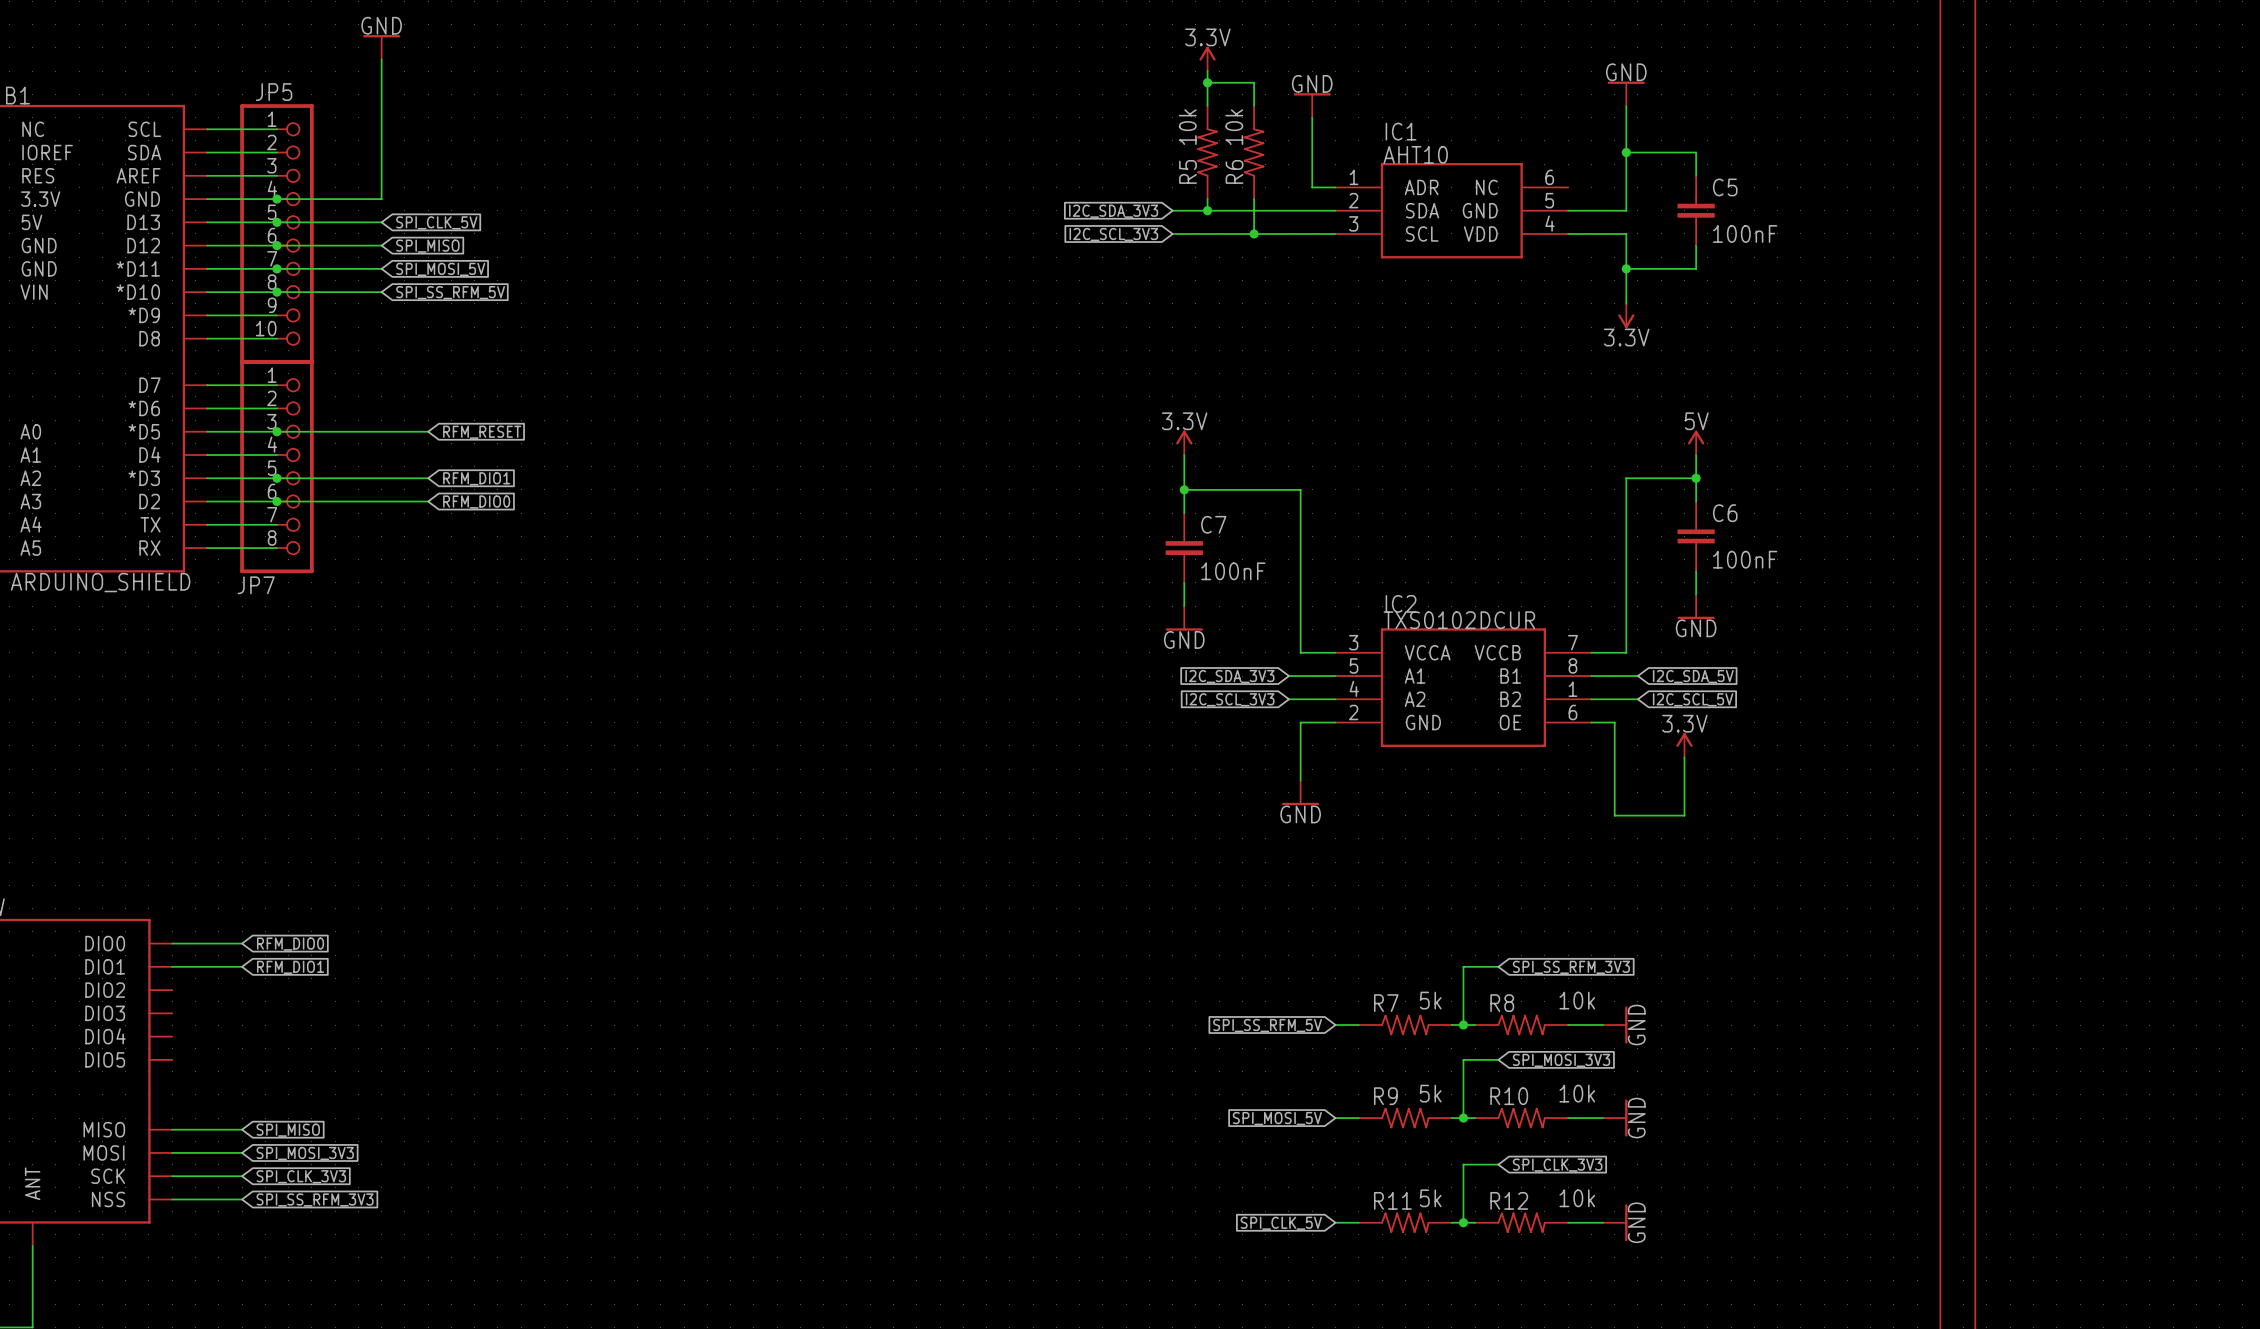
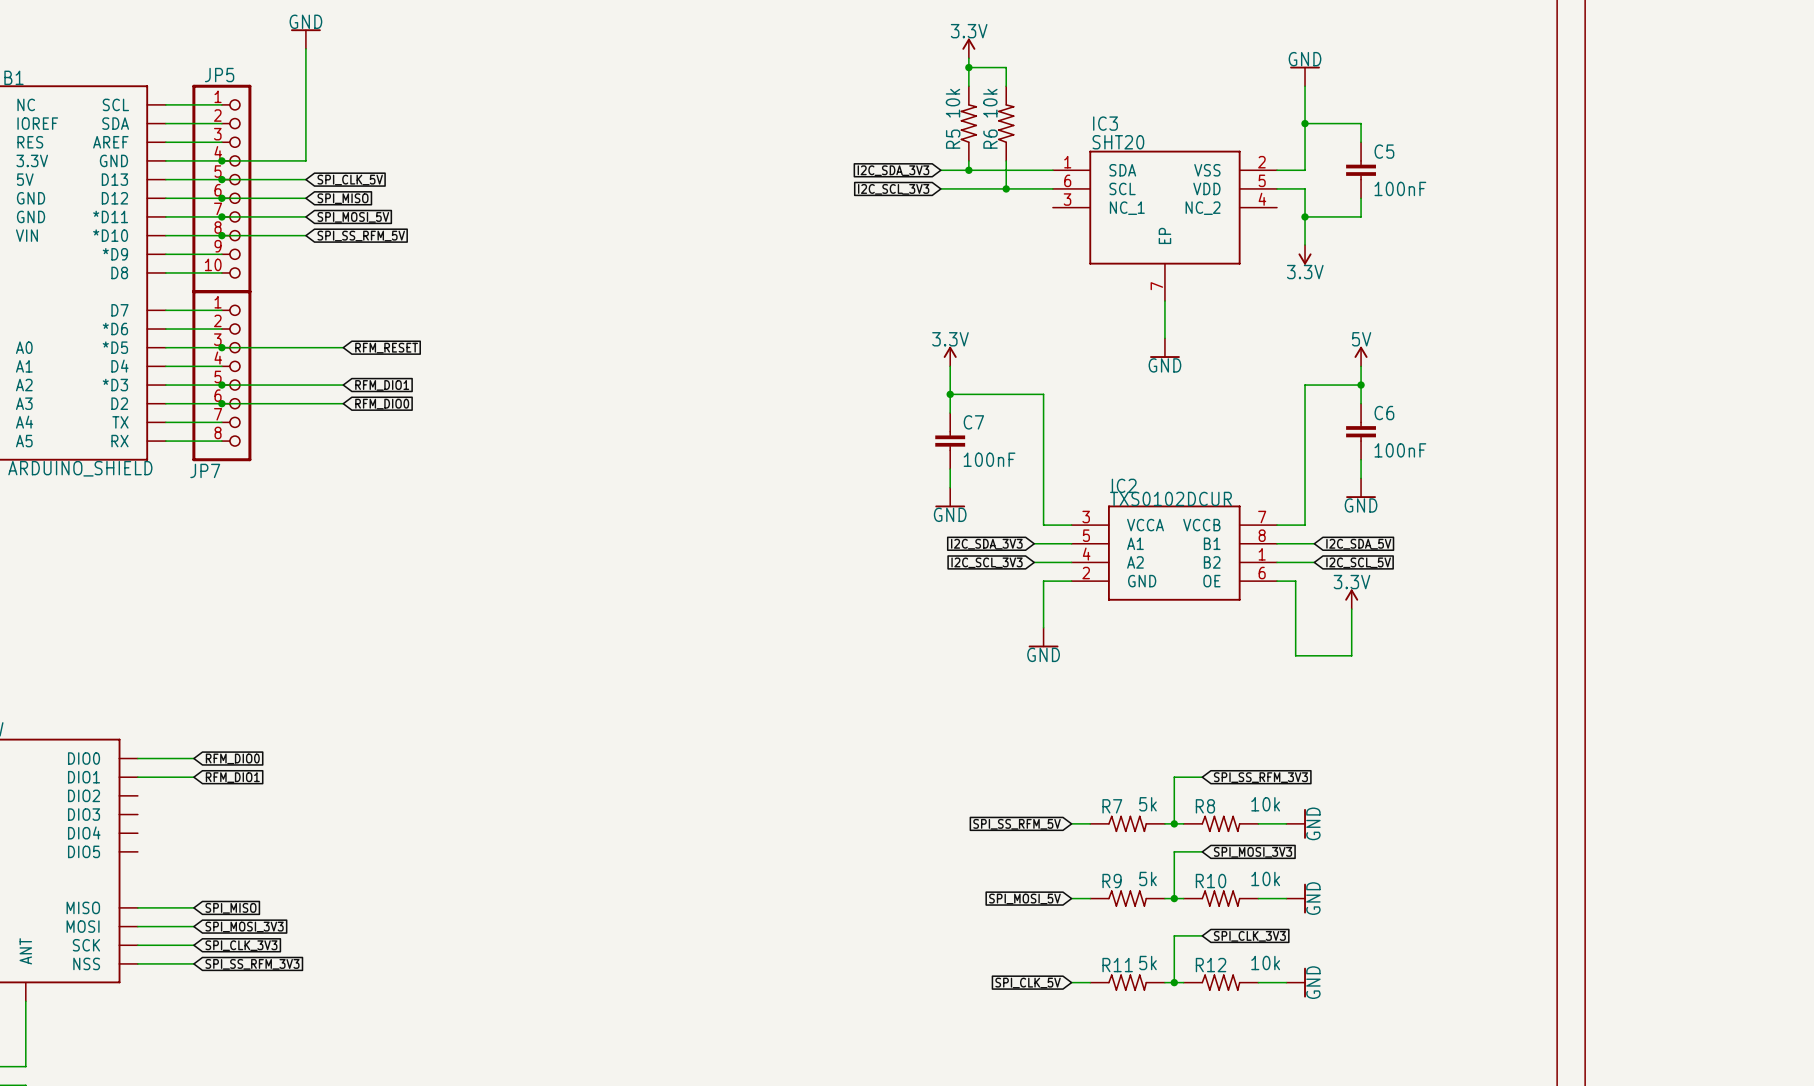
power symbol: GND (1312, 105) -> none
wire: (1312, 117) (1312, 187) (1335, 187) -> none
IC1: AHT10 (1451, 210) -> none
IC3: none -> SHT20 (1164, 225)
wire: none -> (1164, 300) (1164, 338)
power symbol: none -> GND (1164, 348)

